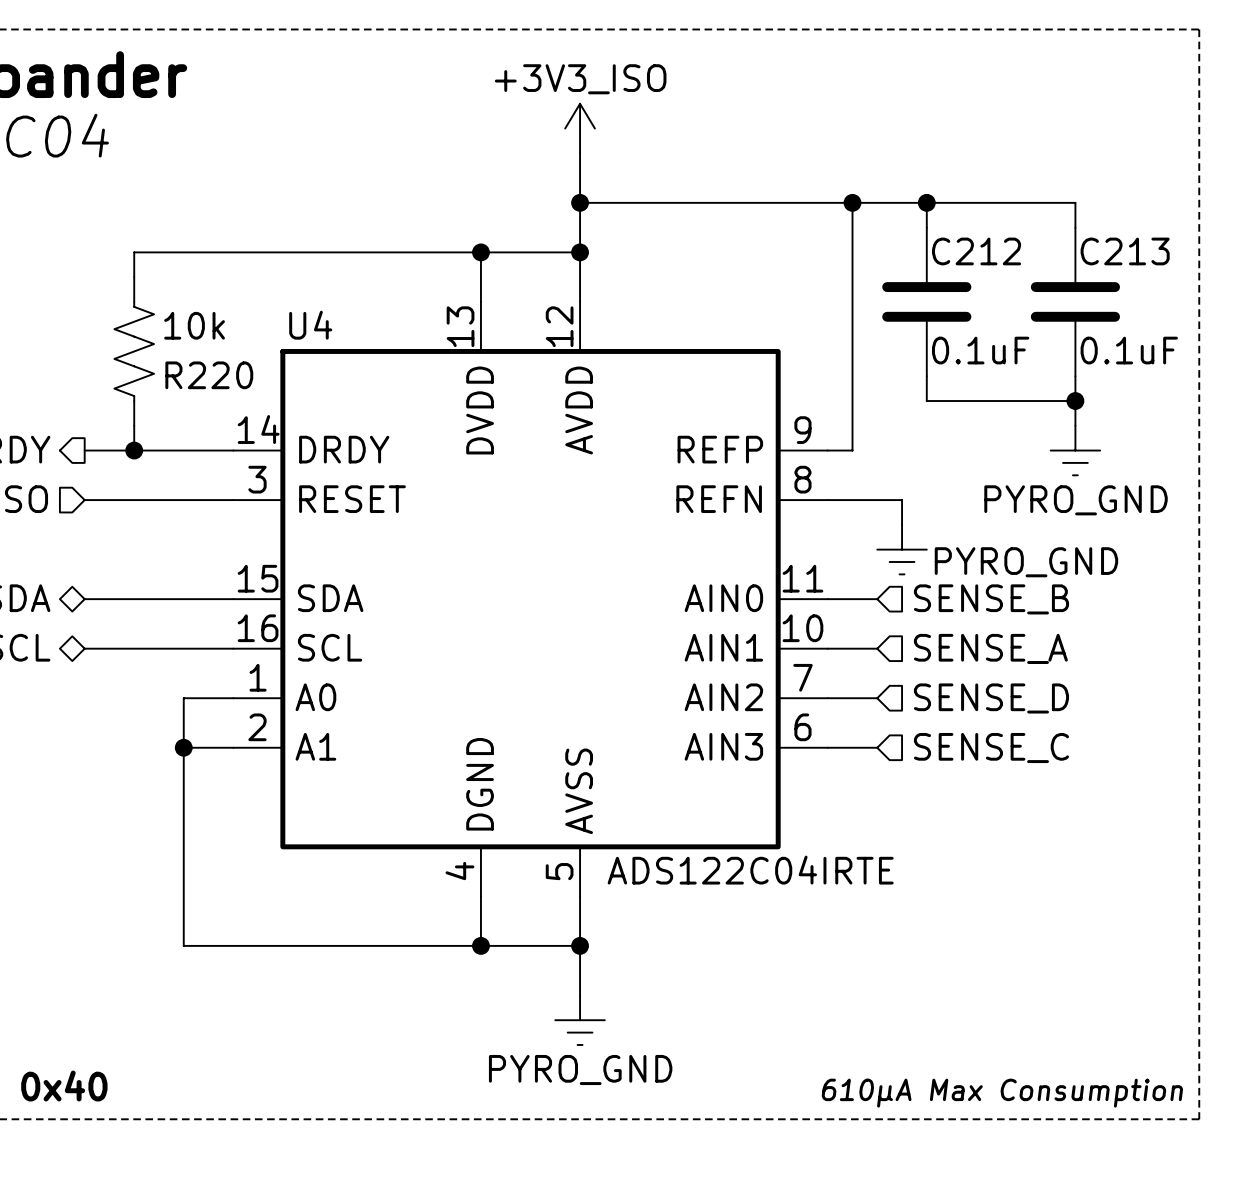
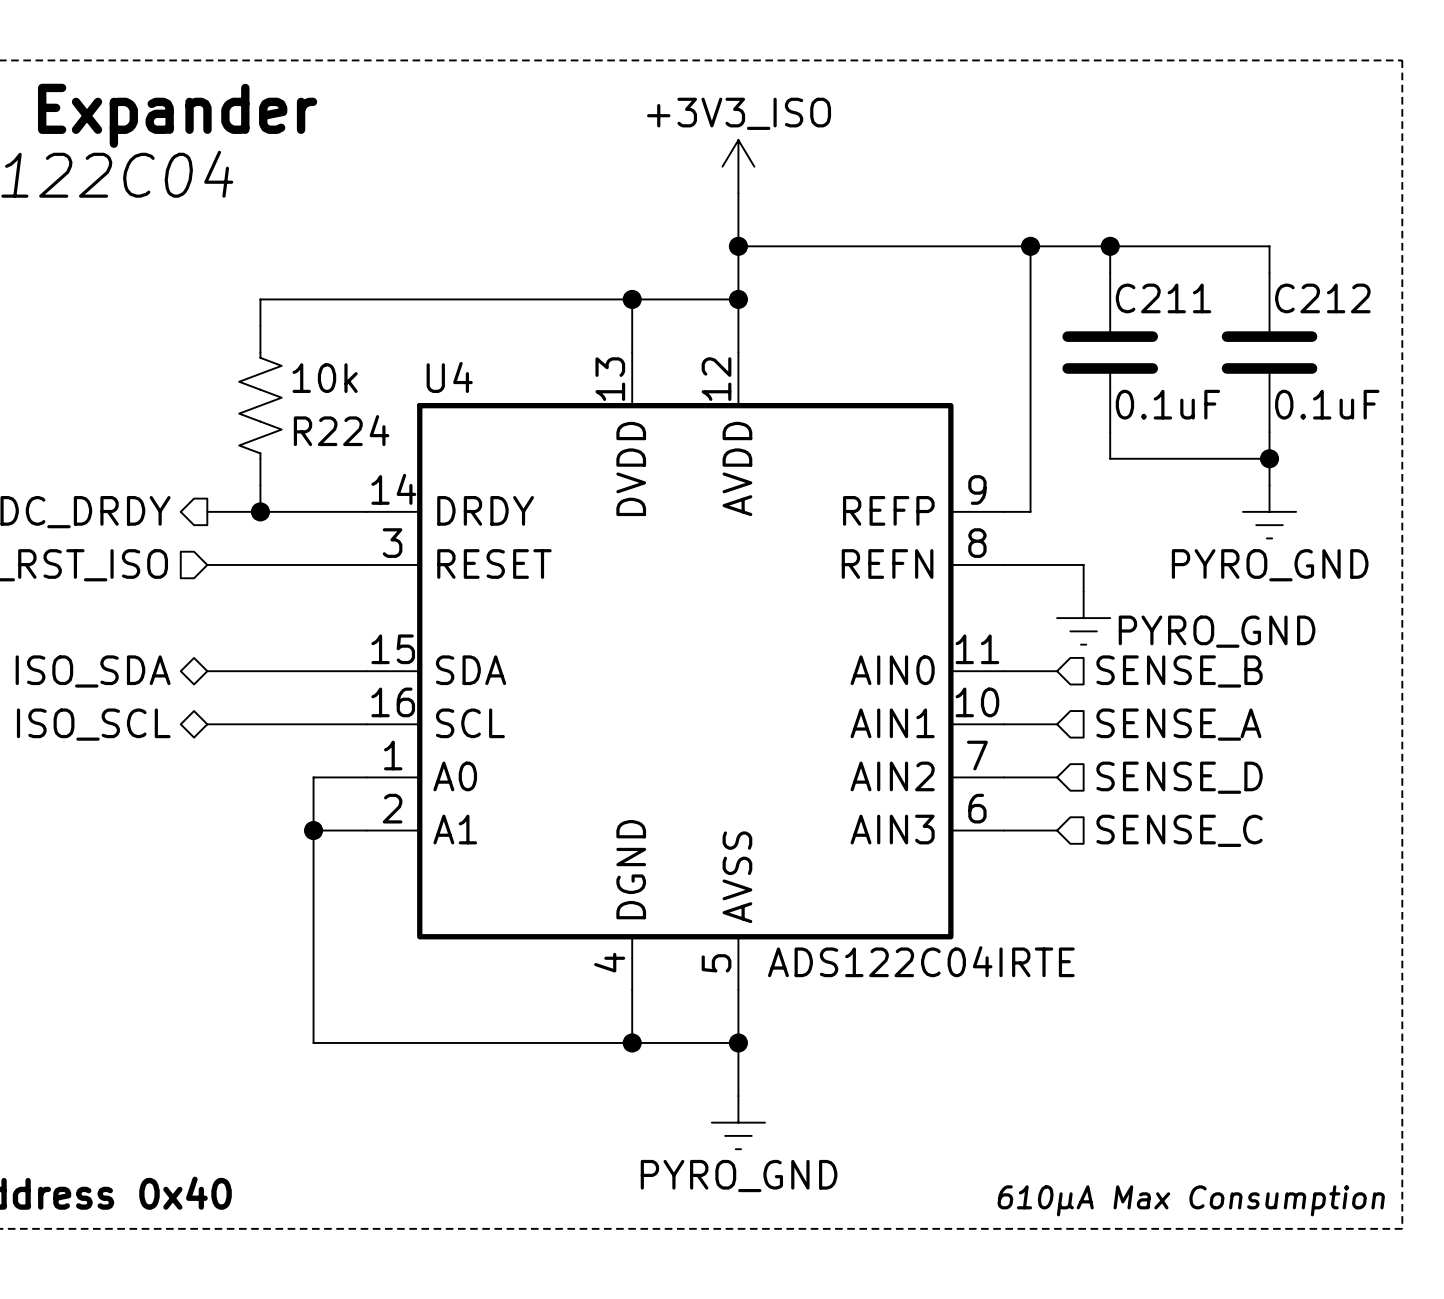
C212 name: C212 (976, 251) -> C211 (1163, 298)
C213 name: C213 (1125, 251) -> C212 (1322, 298)
R220 name: R220 (209, 375) -> R224 (341, 430)

